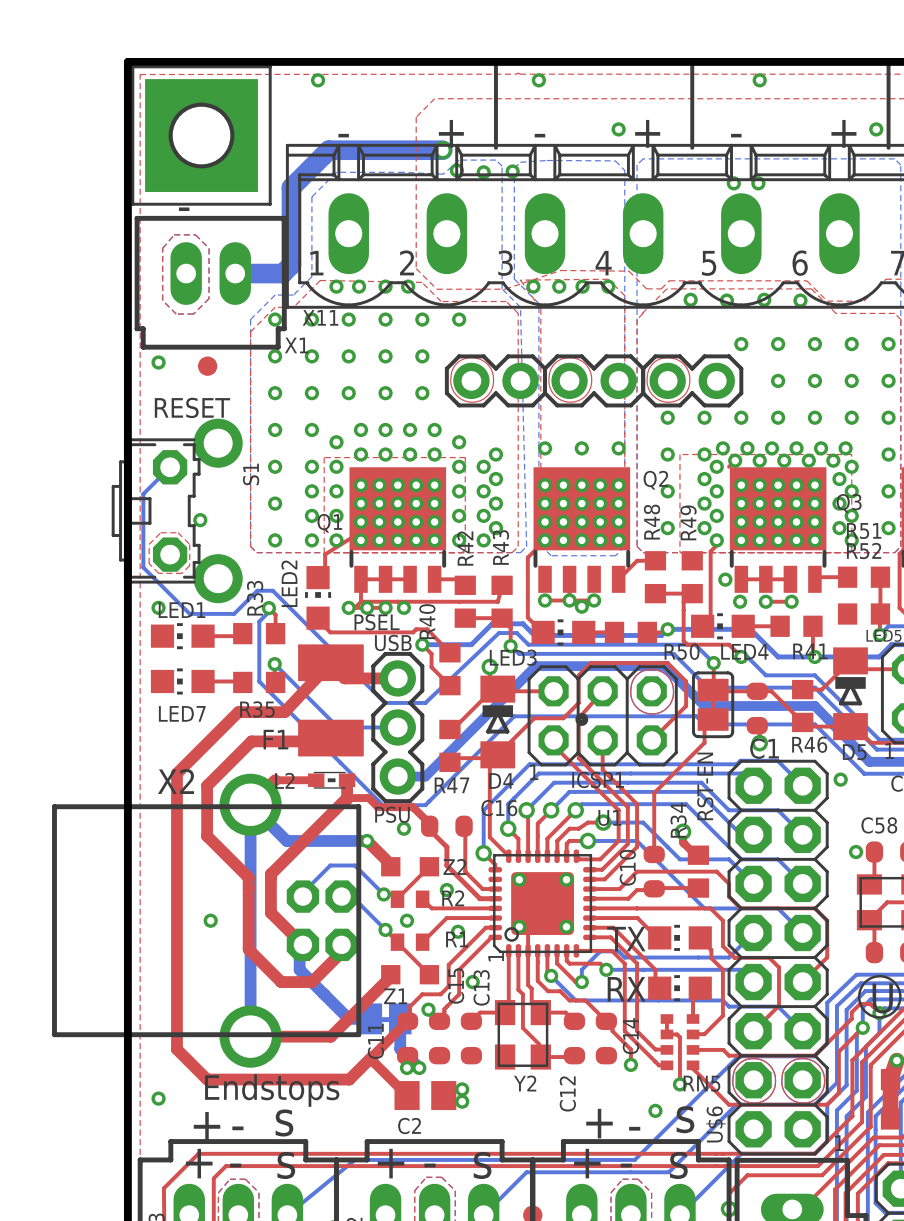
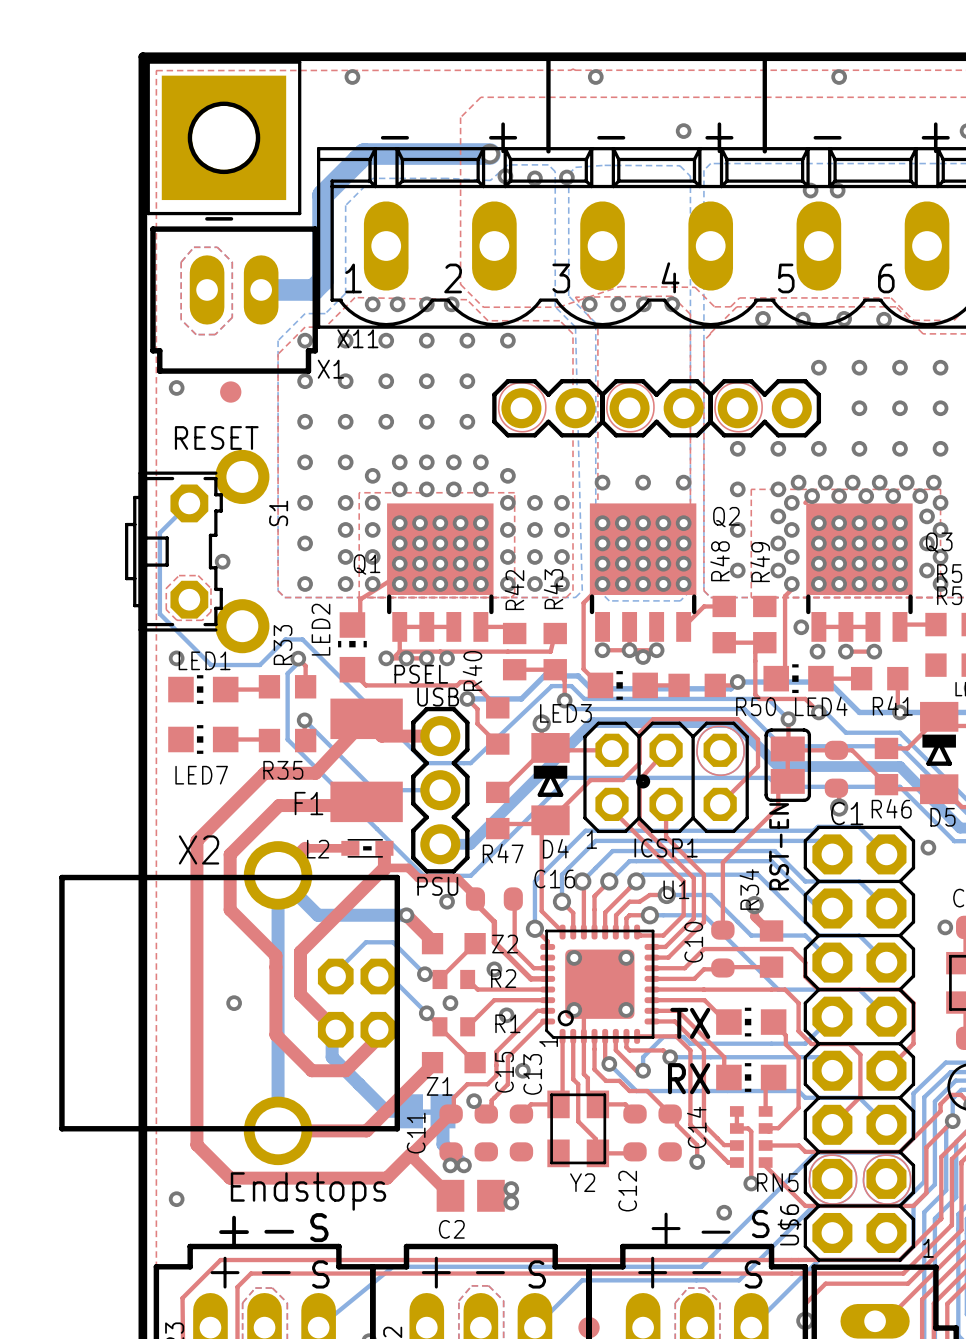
via: (495, 454) -> none
via: none -> (561, 502)
via: (495, 479) -> none
via: none -> (561, 529)
via: (495, 503) -> none
via: none -> (561, 556)
via: (495, 528) -> none
via: none -> (561, 584)

